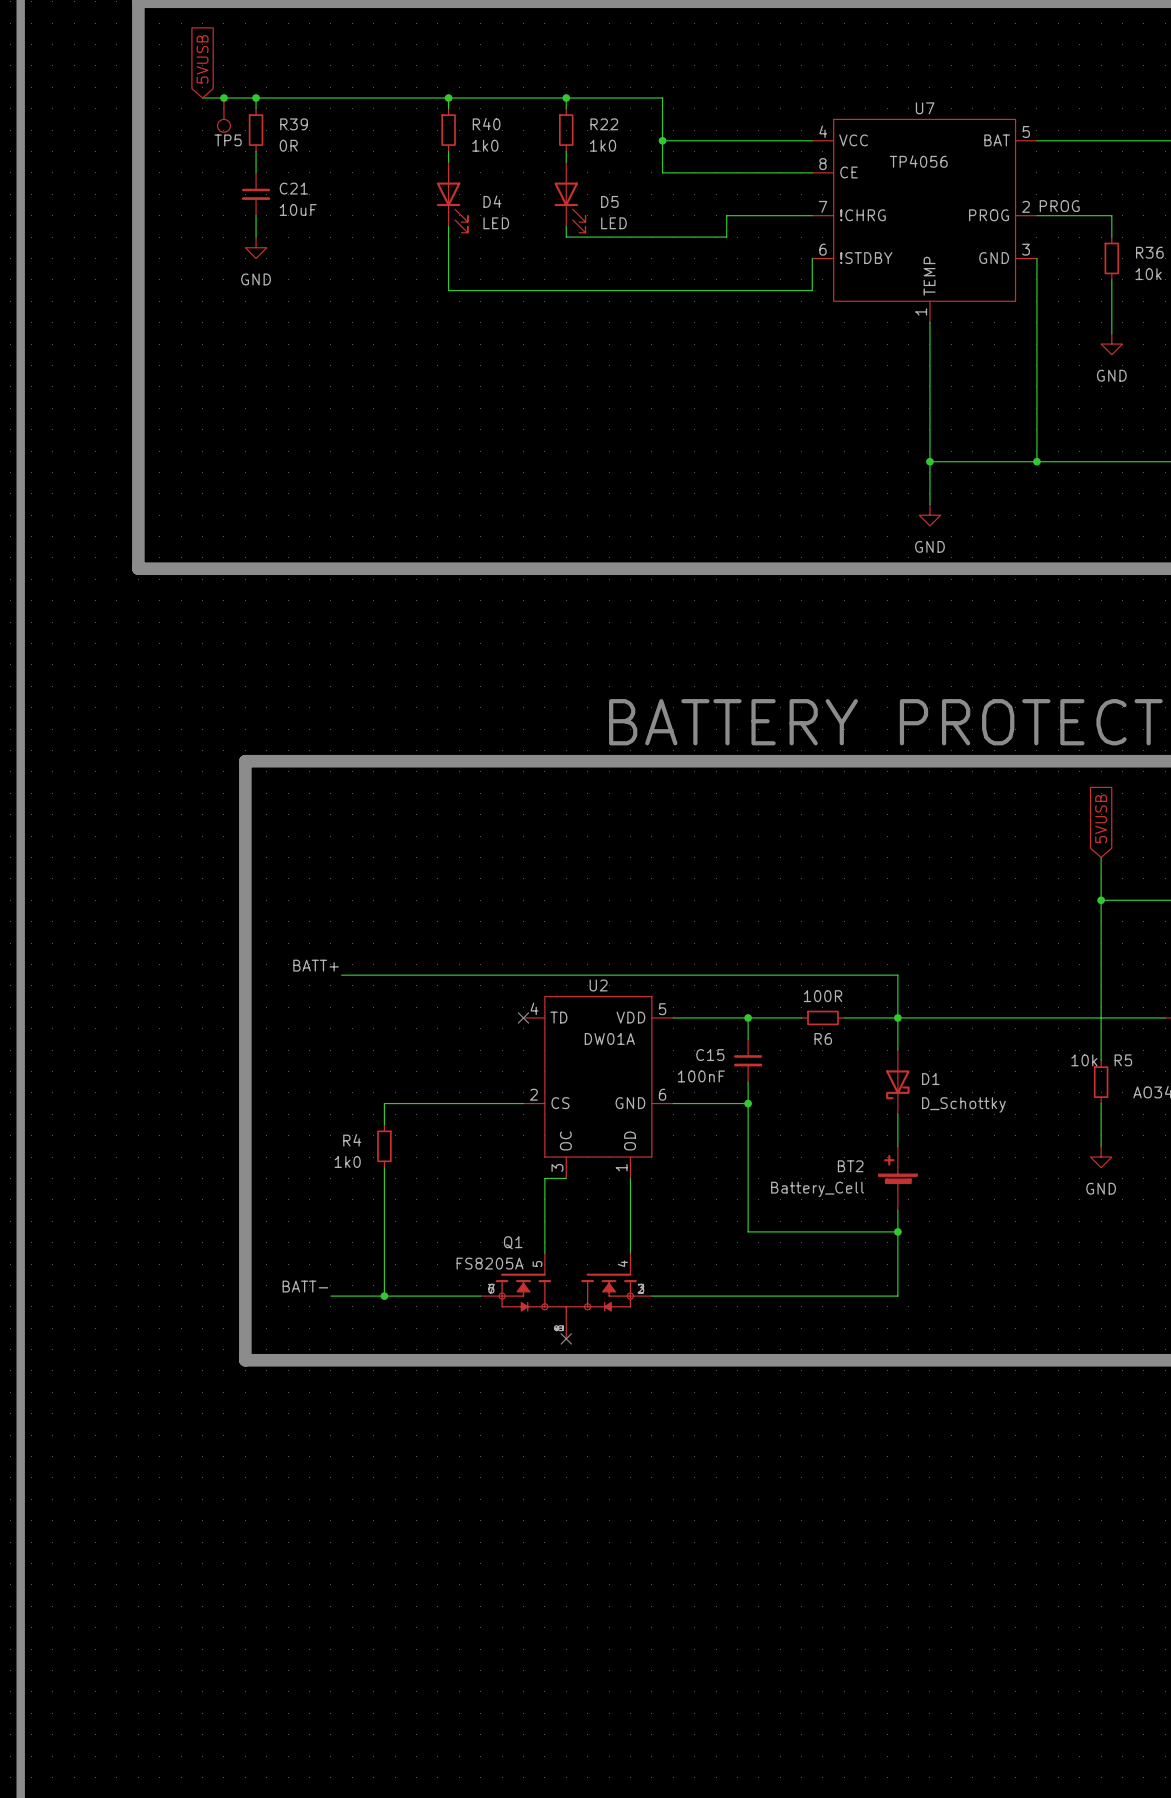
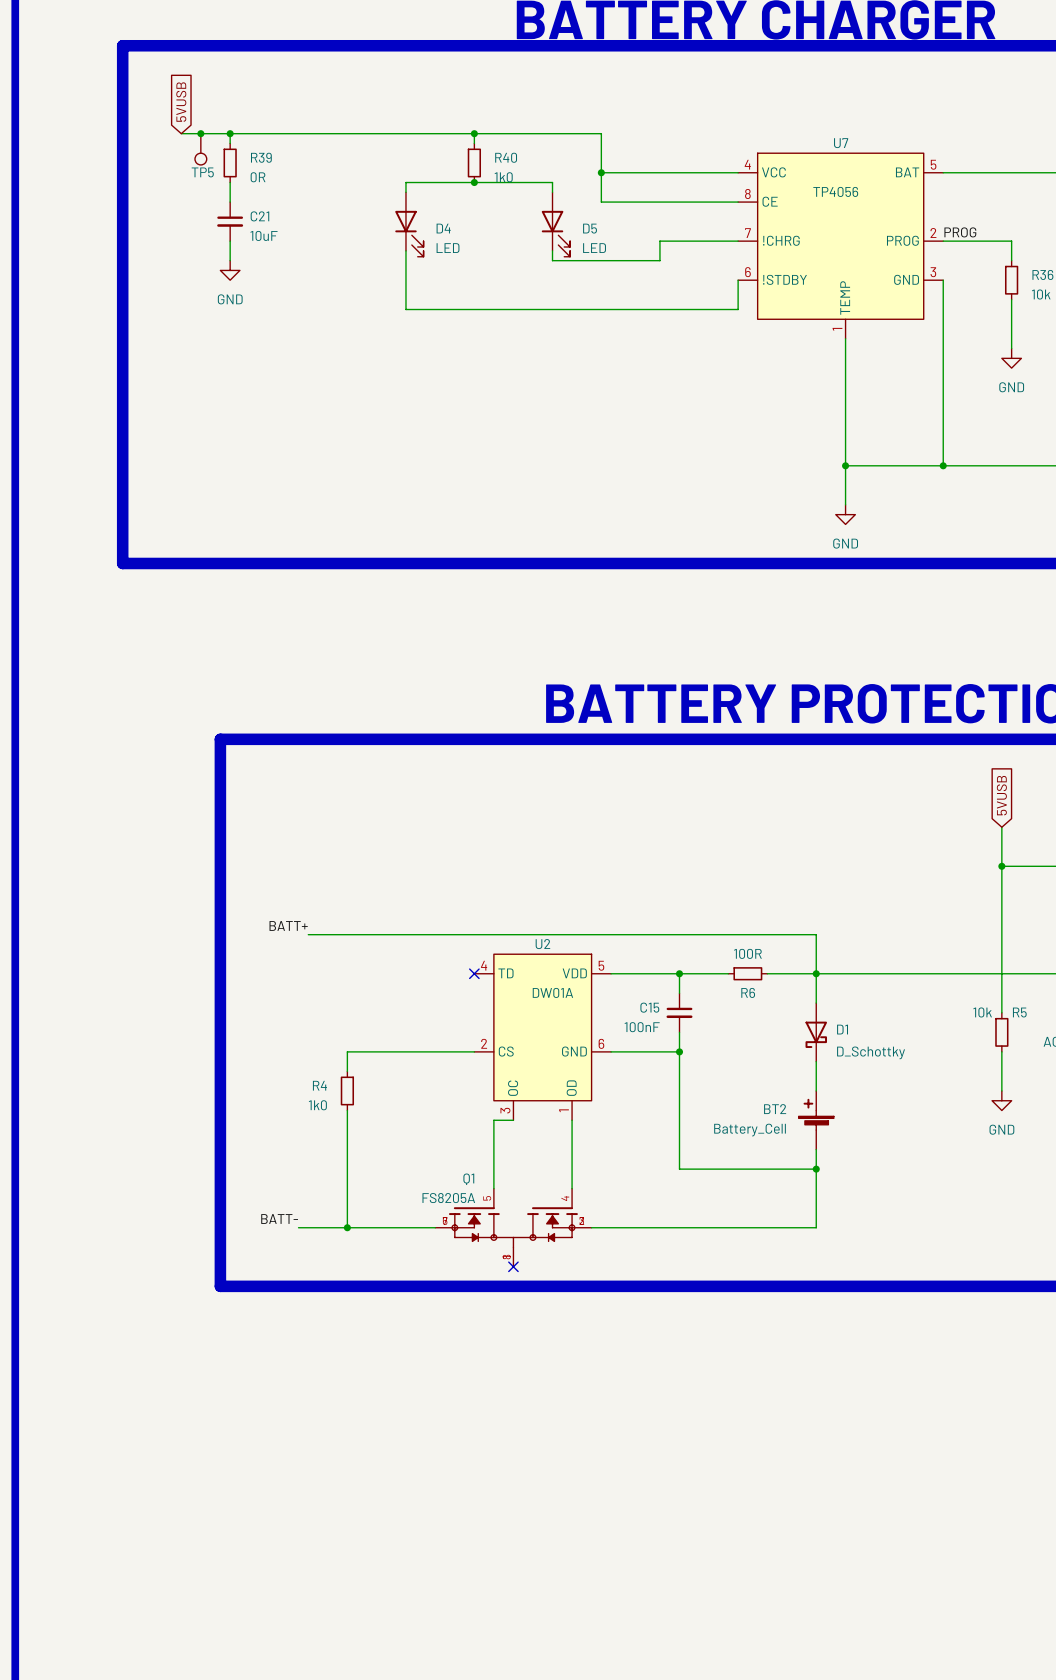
wire: (448, 98) (448, 108) -> none
junction: (448, 98) -> none
junction: none -> (474, 133)
wire: (566, 98) (566, 108) -> (474, 133) (474, 143)
junction: (566, 98) -> none
R40 position: (448, 130) -> (474, 162)
R22: 1k0 (566, 130) -> none
wire: none -> (405, 182) (552, 182) (552, 192)
junction: none -> (474, 182)
wire: (566, 151) (566, 162) -> none
D5 position: (570, 197) -> (555, 224)
wire: (566, 226) (566, 237) (609, 237) -> (552, 250) (552, 260)

